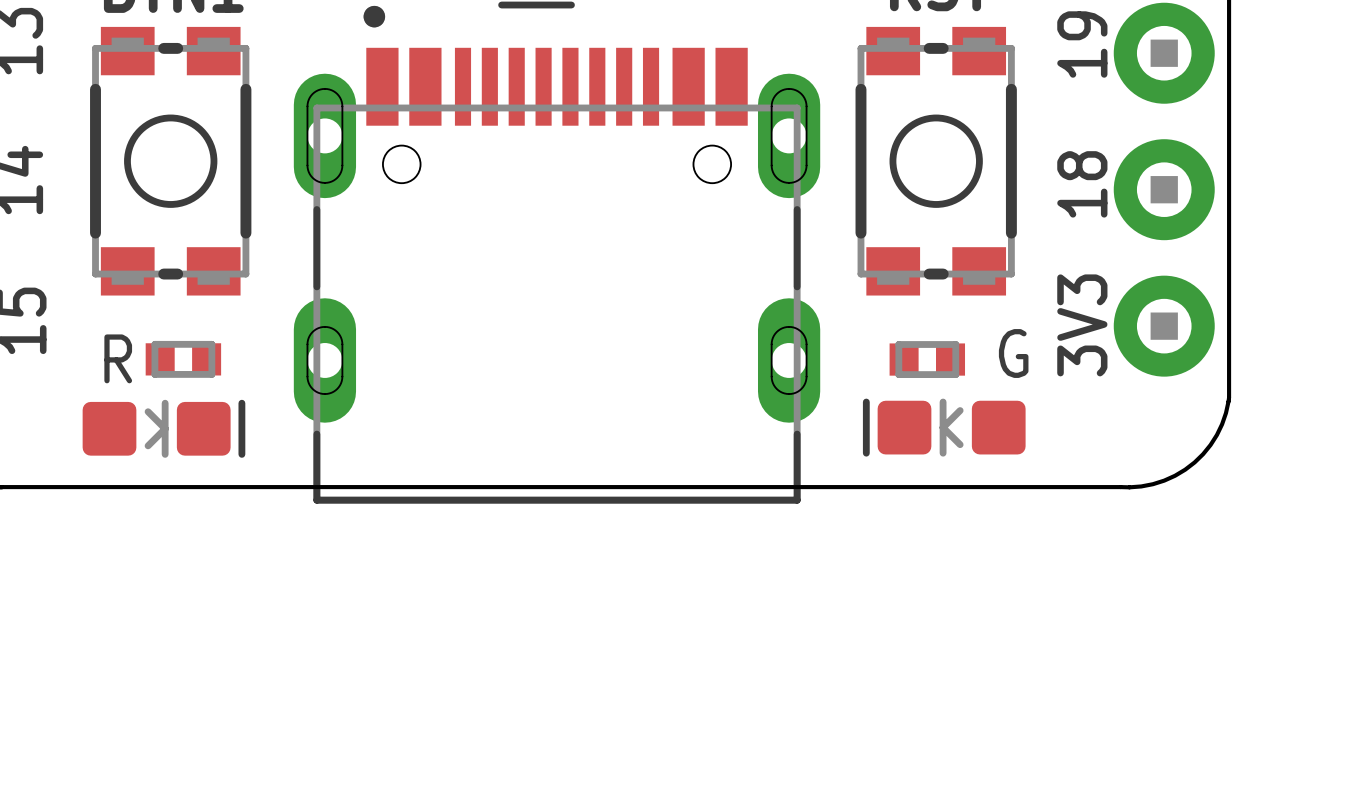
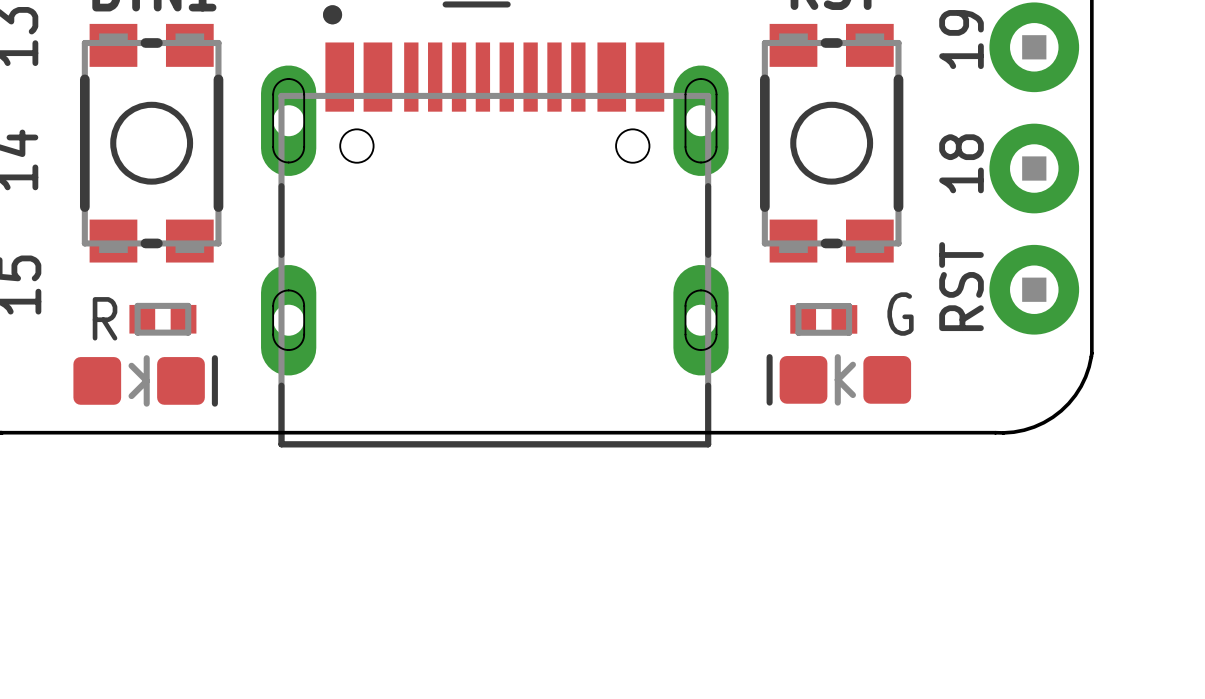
text: 3V3 (1082, 325) -> RST (961, 286)

